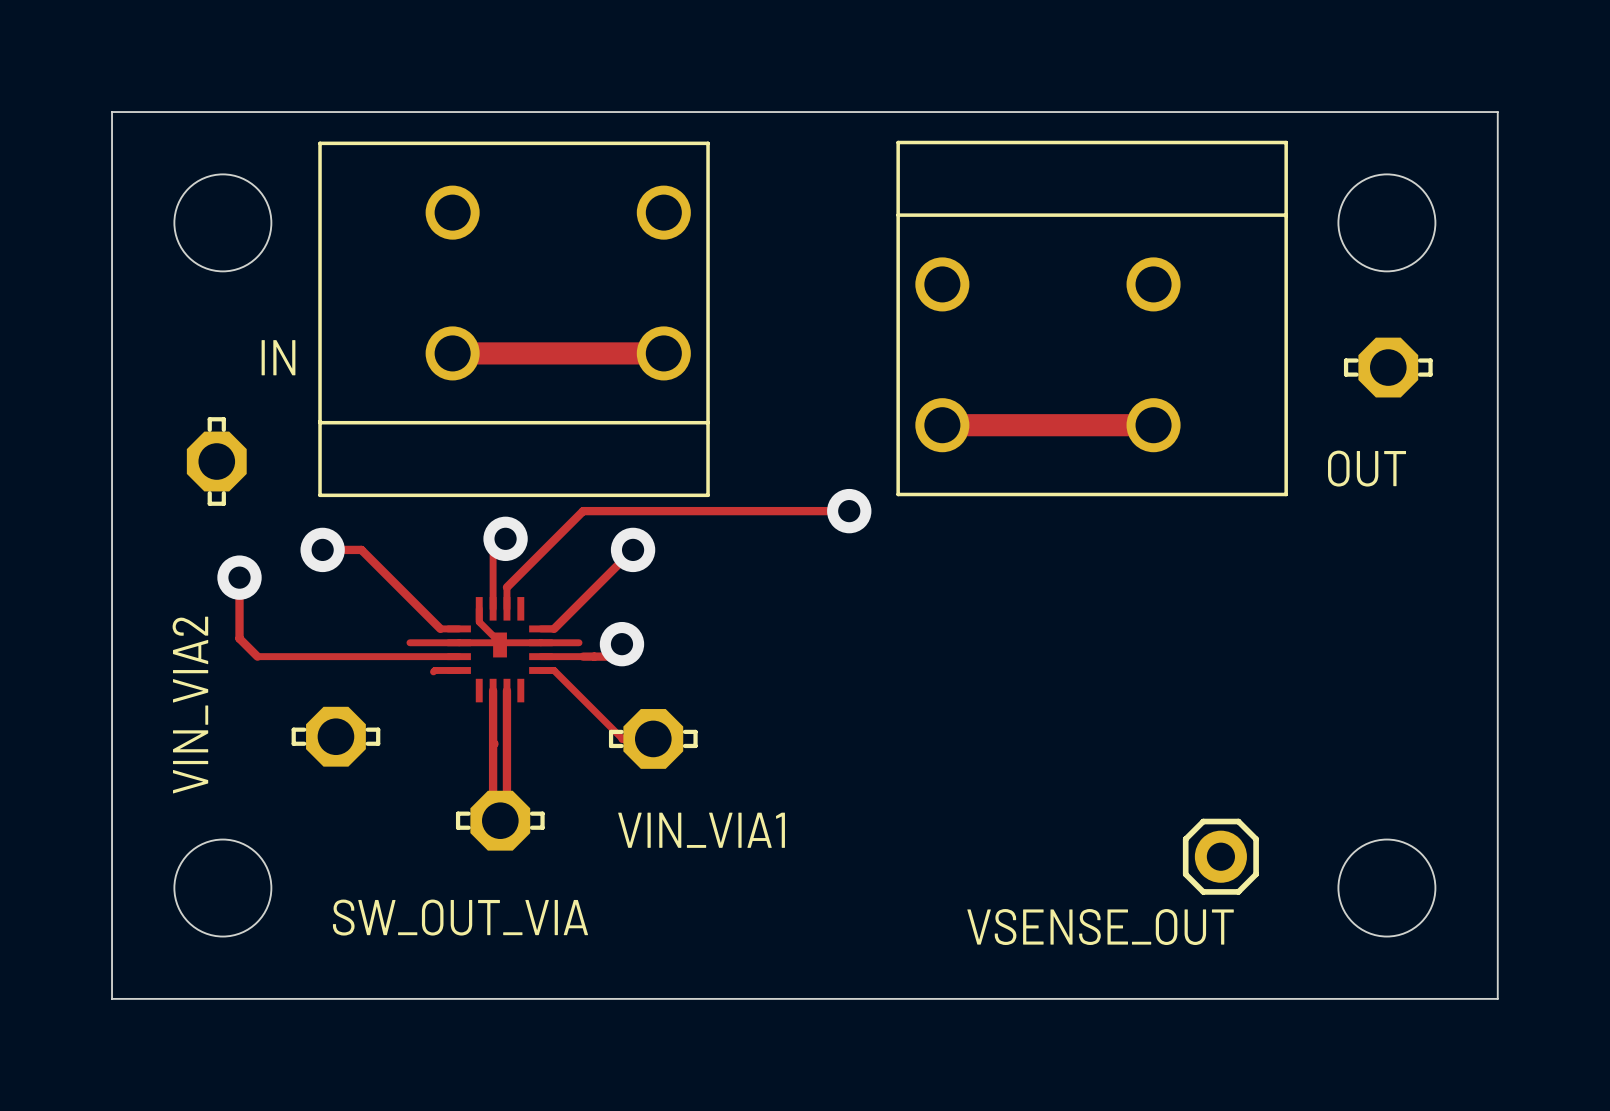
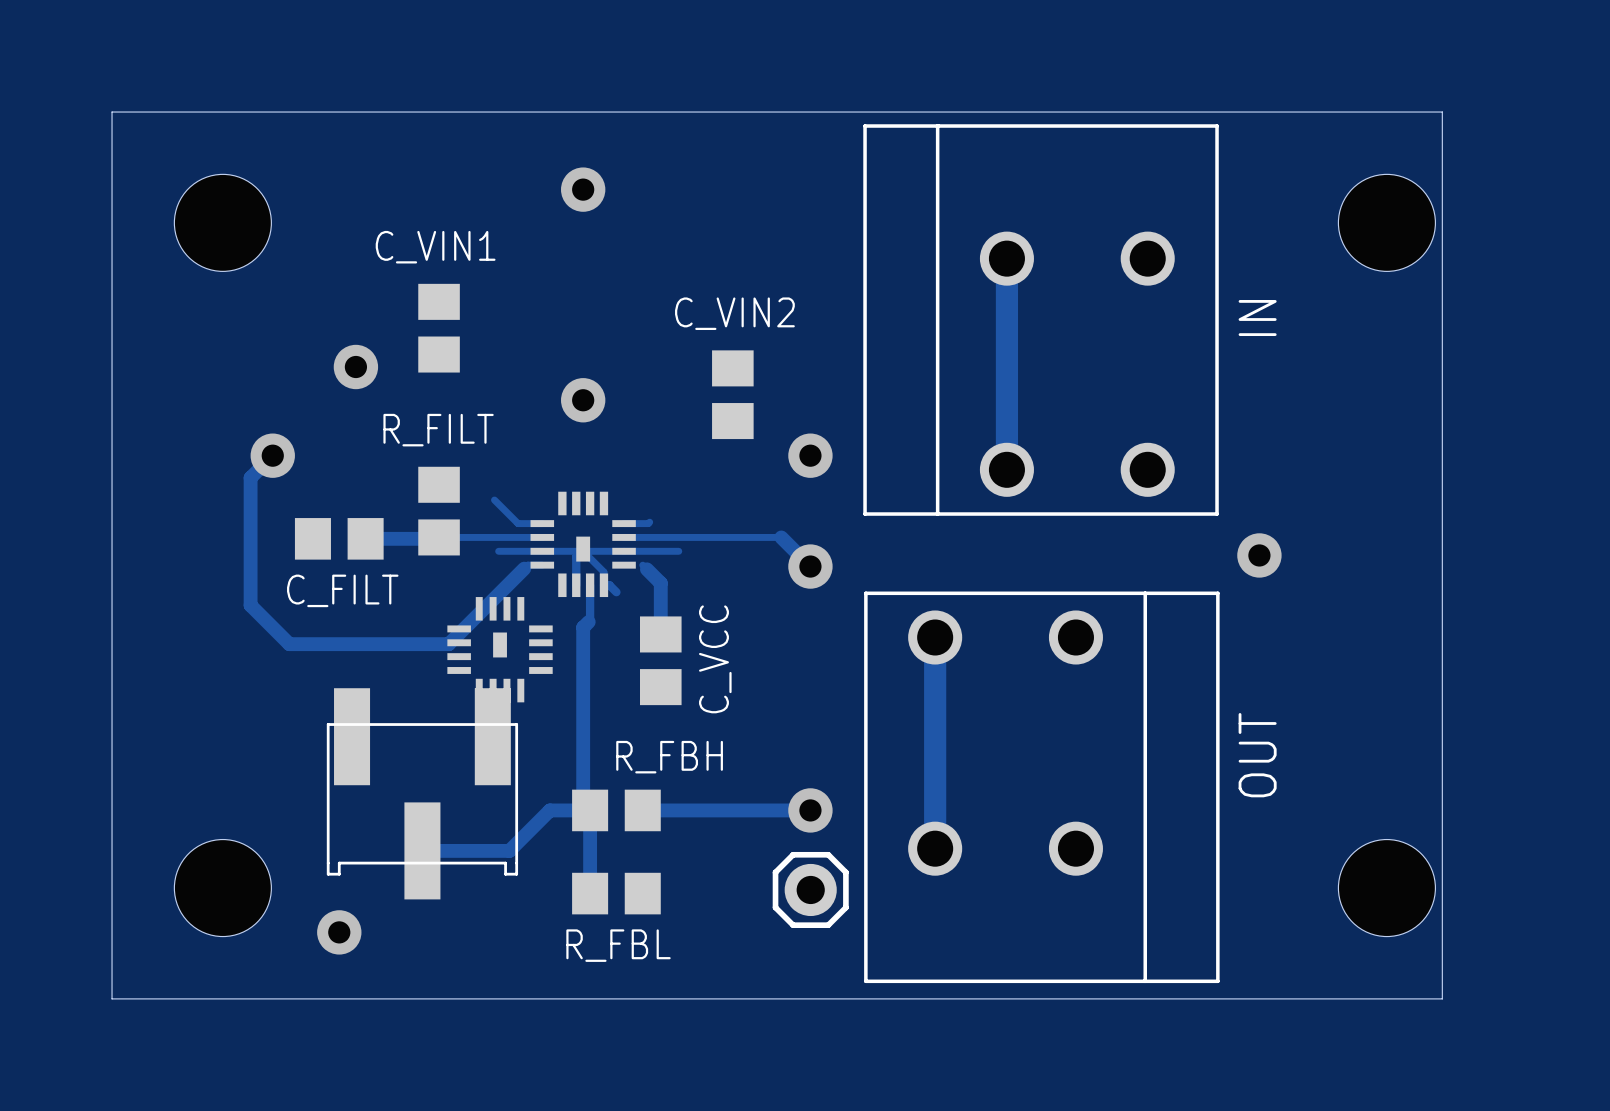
board edge: (1442, 112) (1497, 112) (1497, 998) (1442, 998) -> (1442, 112) (1442, 998)
via: none -> (583, 189)
track: none -> (1006, 258) (1006, 469)
OUT rotation: 0° (1092, 318) -> 90° clockwise (1041, 787)
OUT position: (1092, 318) -> (1041, 787)
IN rotation: 0° (514, 319) -> 90° clockwise (1041, 320)
IN position: (514, 319) -> (1041, 320)
C_VIN1: none -> (439, 328)
track: (452, 353) (663, 353) -> none
IN name position: IN (278, 357) -> IN (1257, 318)
via: none -> (355, 367)
part: (1388, 367) -> none
C_VIN2: none -> (732, 394)
via: none -> (583, 400)
track: (942, 425) (1153, 425) -> none
track: none -> (272, 455) (250, 477) (250, 605) (289, 644) (448, 644) (527, 565) (542, 565)
via: none -> (272, 455)
via: none -> (810, 455)
part: (216, 461) -> none
OUT name position: OUT (1367, 468) -> OUT (1257, 755)
track: none -> (494, 500) (518, 523) (542, 523)
R_FILT: none -> (439, 511)
track: (849, 511) (583, 511) (506, 587) (506, 608) -> none
via: (849, 511) -> none
track: none -> (649, 522) (624, 523)
track: none -> (542, 537) (365, 538)
track: none -> (624, 537) (781, 537) (810, 566)
C_FILT: none -> (339, 538)
track: (505, 538) (493, 551) (493, 608) -> none
via: (505, 538) -> none
part: none -> (583, 544)
track: (322, 549) (361, 549) (440, 628) (459, 628) -> none
via: (322, 549) -> none
track: (633, 549) (554, 628) (540, 628) -> none
via: (633, 549) -> none
track: none -> (498, 551) (678, 551)
via: none -> (1259, 555)
track: none -> (642, 565) (660, 583) (660, 634)
via: none -> (810, 566)
track: (239, 577) (239, 638) (257, 656) (459, 656) -> none
via: (239, 577) -> none
track: none -> (576, 585) (576, 556) (582, 550) (603, 572) (603, 585) (609, 585) (616, 592)
track: none -> (590, 585) (590, 620) (583, 627) (583, 803) (590, 810)
track: (479, 608) (479, 621) (500, 642) -> none
track: none -> (935, 637) (935, 848)
track: (409, 642) (579, 642) -> none
track: (621, 644) (609, 656) (540, 656) -> none
via: (621, 644) -> none
C_VCC: none -> (660, 660)
track: (459, 670) (433, 671) -> none
track: (540, 670) (554, 670) (622, 738) (653, 738) -> none
track: (493, 690) (493, 814) (500, 821) (506, 814) (506, 690) -> none
VIN_VIA2: (335, 736) -> none
VIN_VIA1: (653, 738) -> none
part: none -> (422, 793)
track: none -> (590, 810) (549, 810) (509, 850) (422, 850)
track: none -> (590, 810) (590, 893)
R_FBH: none -> (616, 810)
track: none -> (642, 810) (810, 810)
via: none -> (810, 810)
SW_OUT_VIA: (500, 820) -> none
VSENSE_OUT: (1220, 856) -> none
part: none -> (810, 889)
R_FBL: none -> (616, 893)
via: none -> (339, 932)

